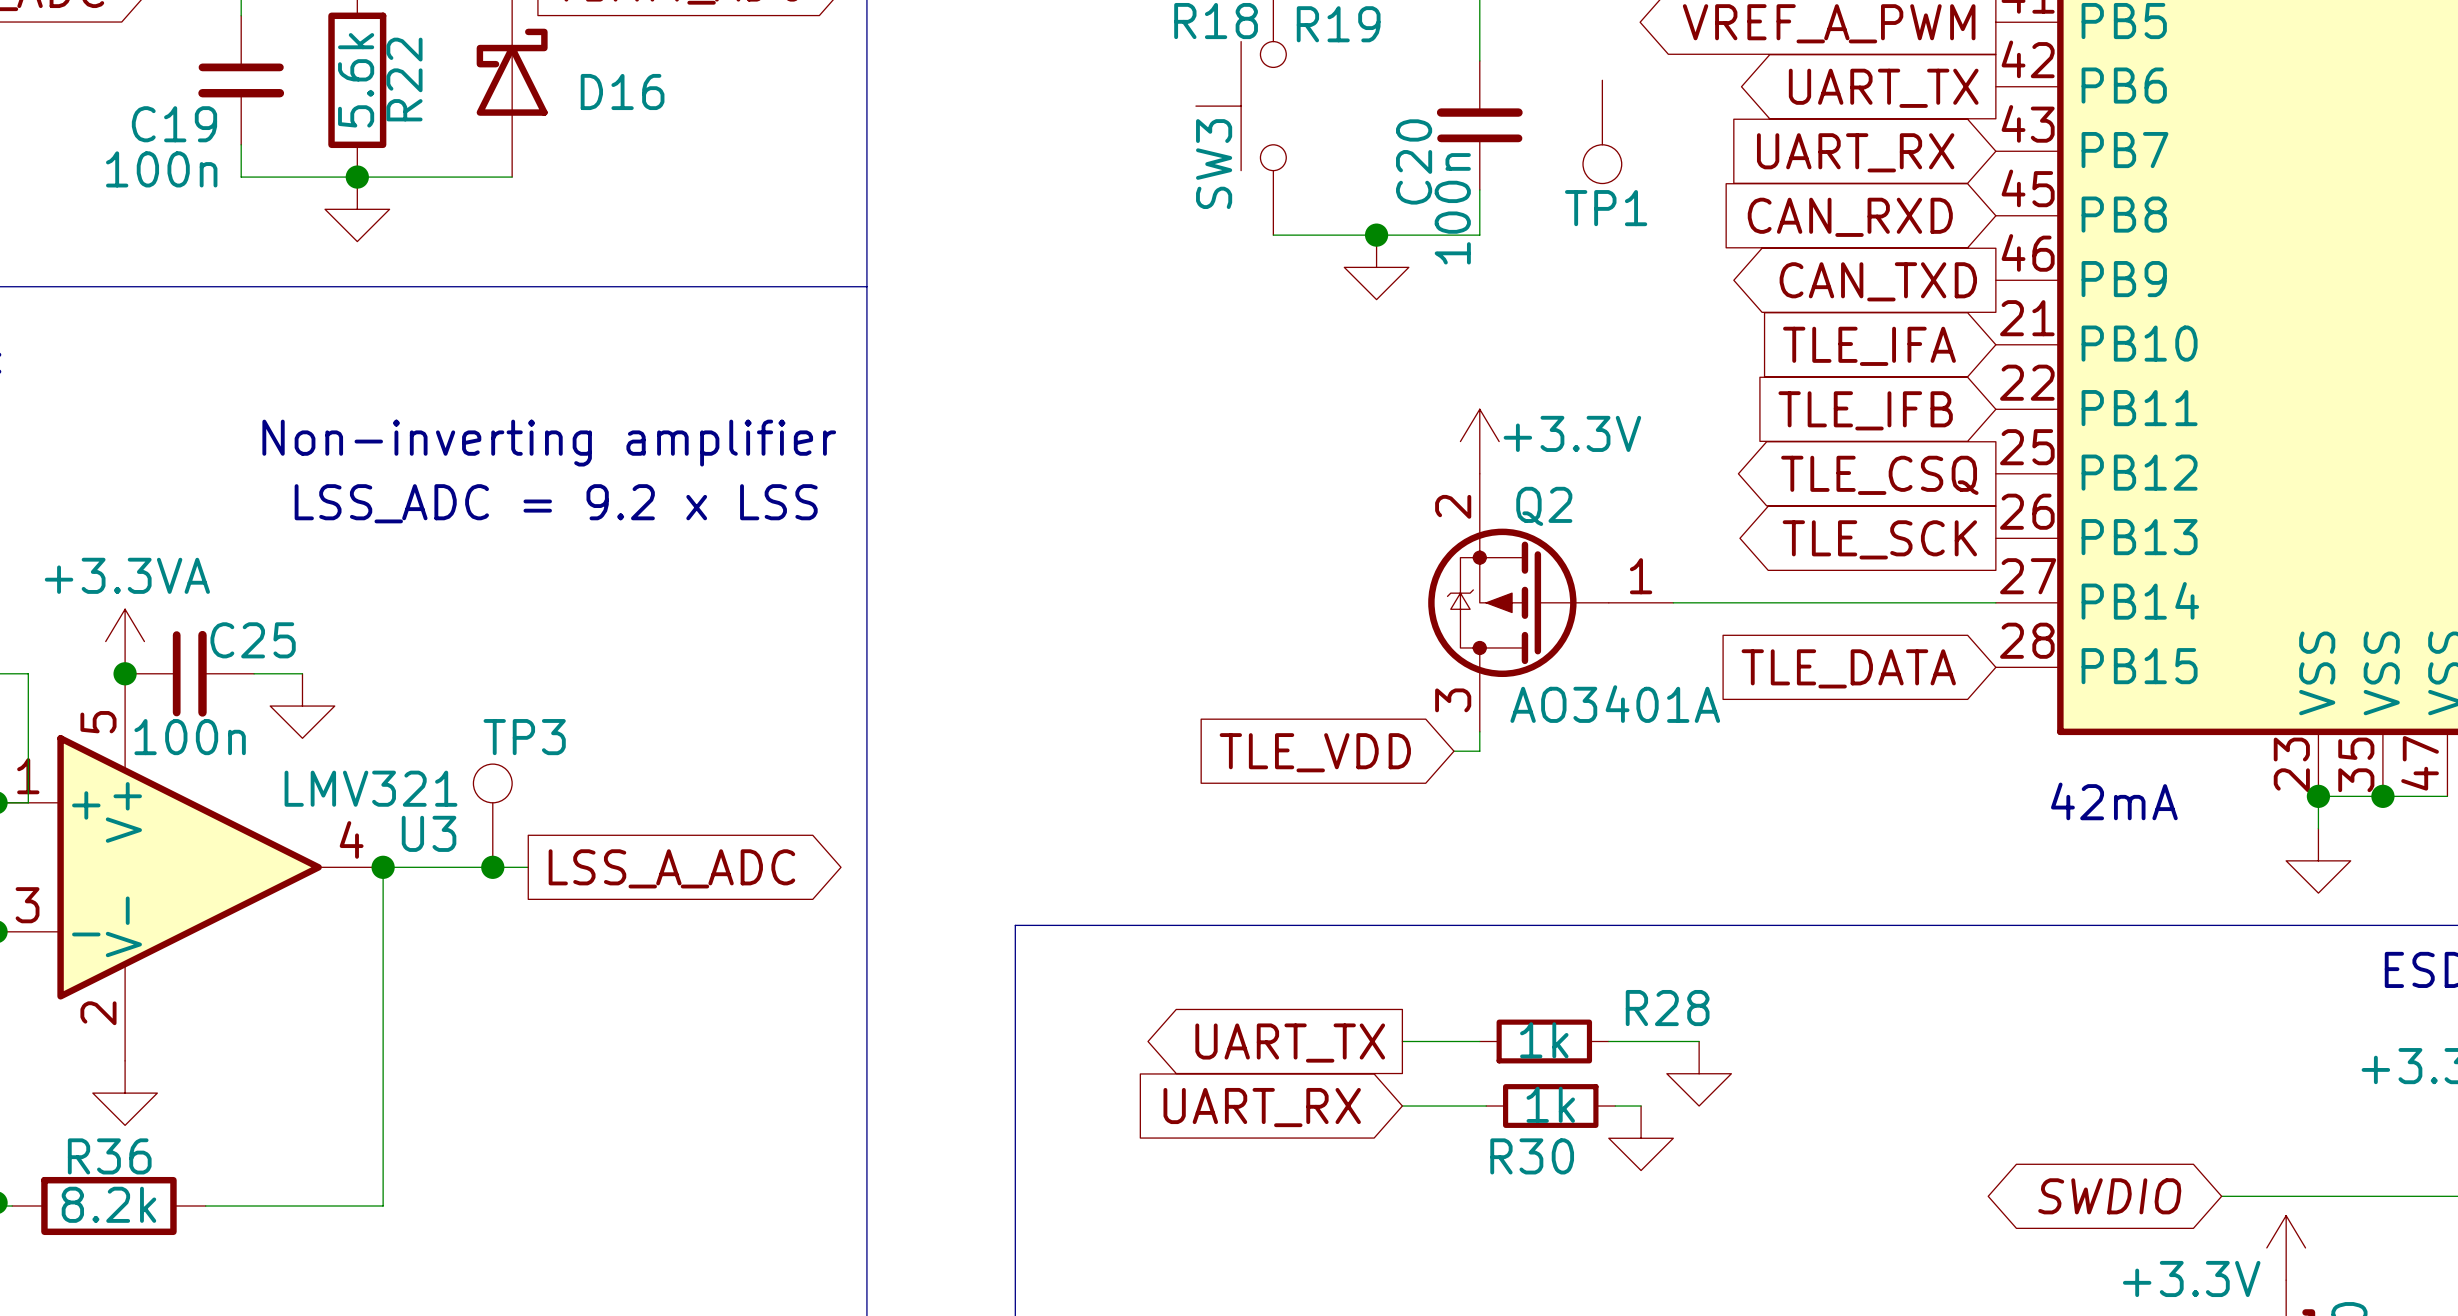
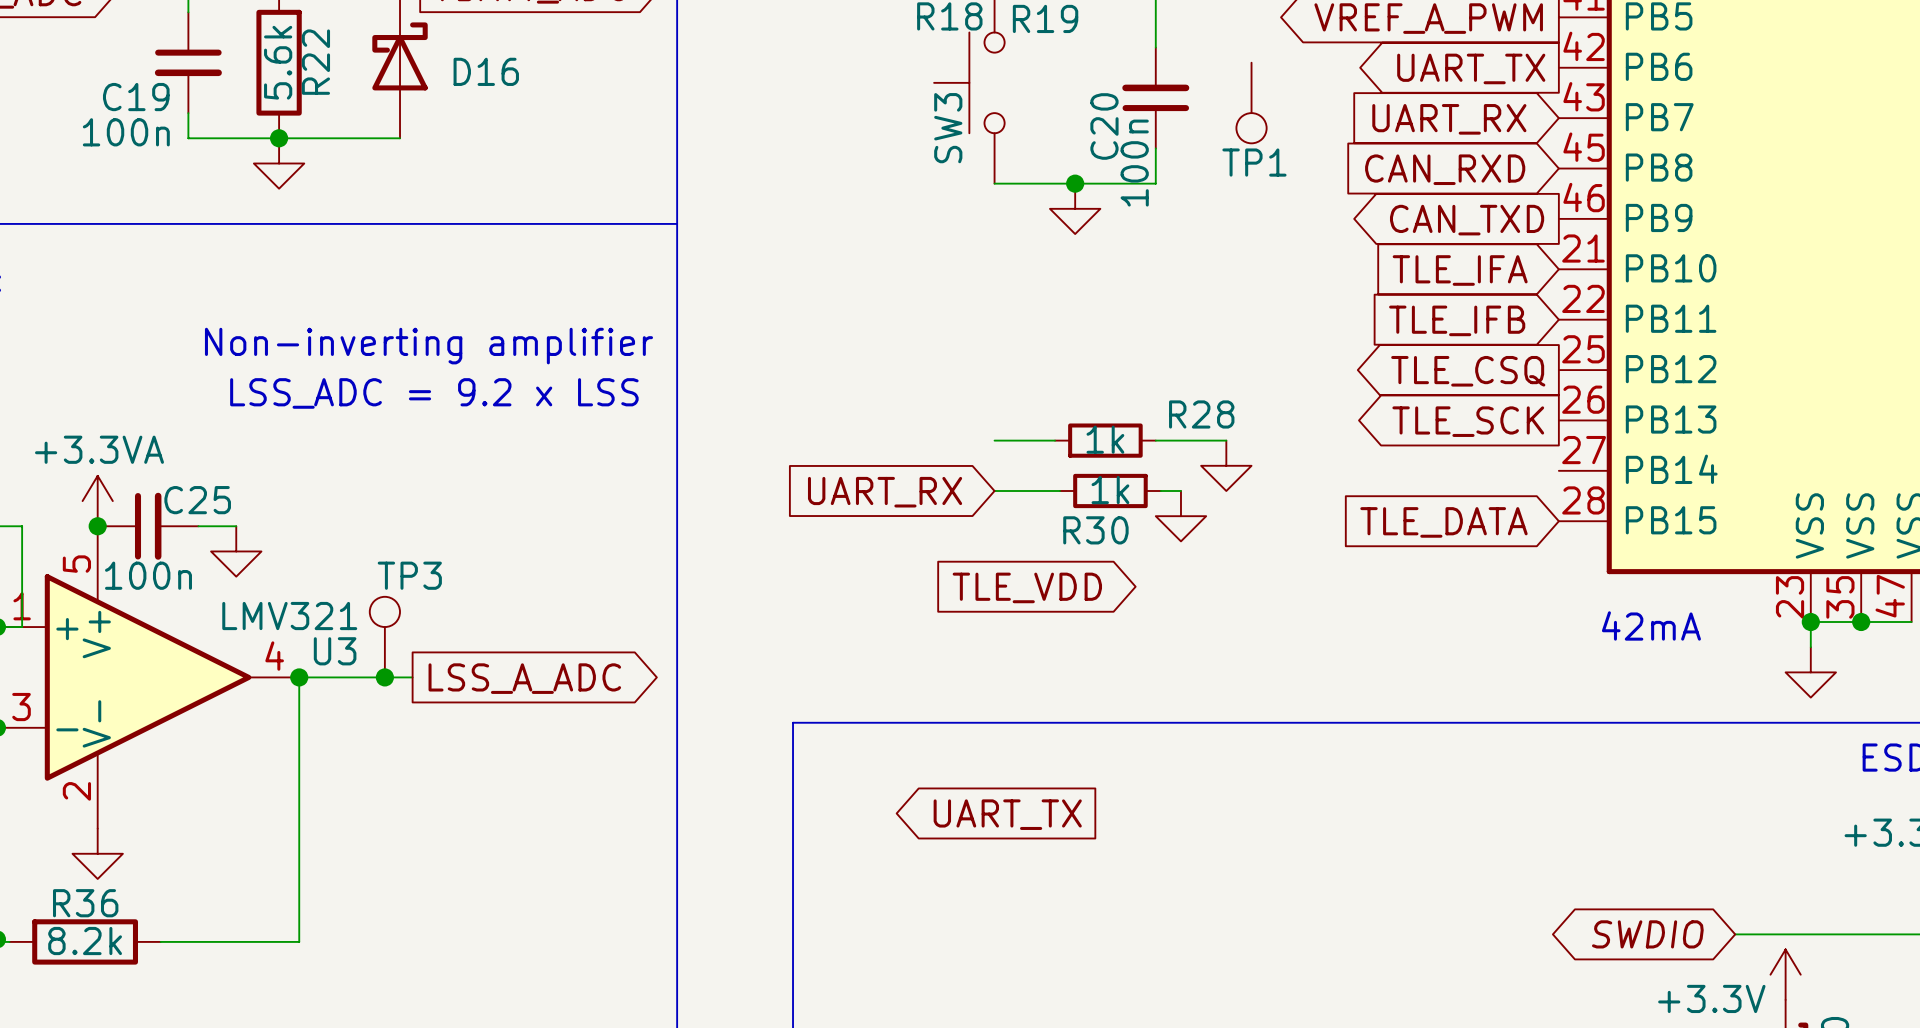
power symbol: +3.3V (1479, 441) -> none
power symbol: none -> (1226, 465)
Q2: AO3401A (1550, 602) -> none
wire: (1673, 602) (1995, 602) -> none
power symbol: none -> (1180, 516)
wire: (1479, 731) (1479, 751) (1453, 751) -> none
wire: (1402, 1041) (1479, 1041) -> (994, 440) (1055, 440)
R28 position: (1544, 1041) -> (1105, 440)
wire: (1608, 1041) (1699, 1041) -> (1155, 440) (1226, 440)
power symbol: (1699, 1073) -> none
wire: (1402, 1106) (1486, 1106) -> (994, 490) (1060, 490)
R30 position: (1550, 1106) -> (1110, 490)
wire: (1615, 1106) (1641, 1106) -> (1160, 490) (1180, 490)
global label position: UART_RX (1262, 1107) -> UART_RX (885, 492)
power symbol: (1641, 1138) -> none

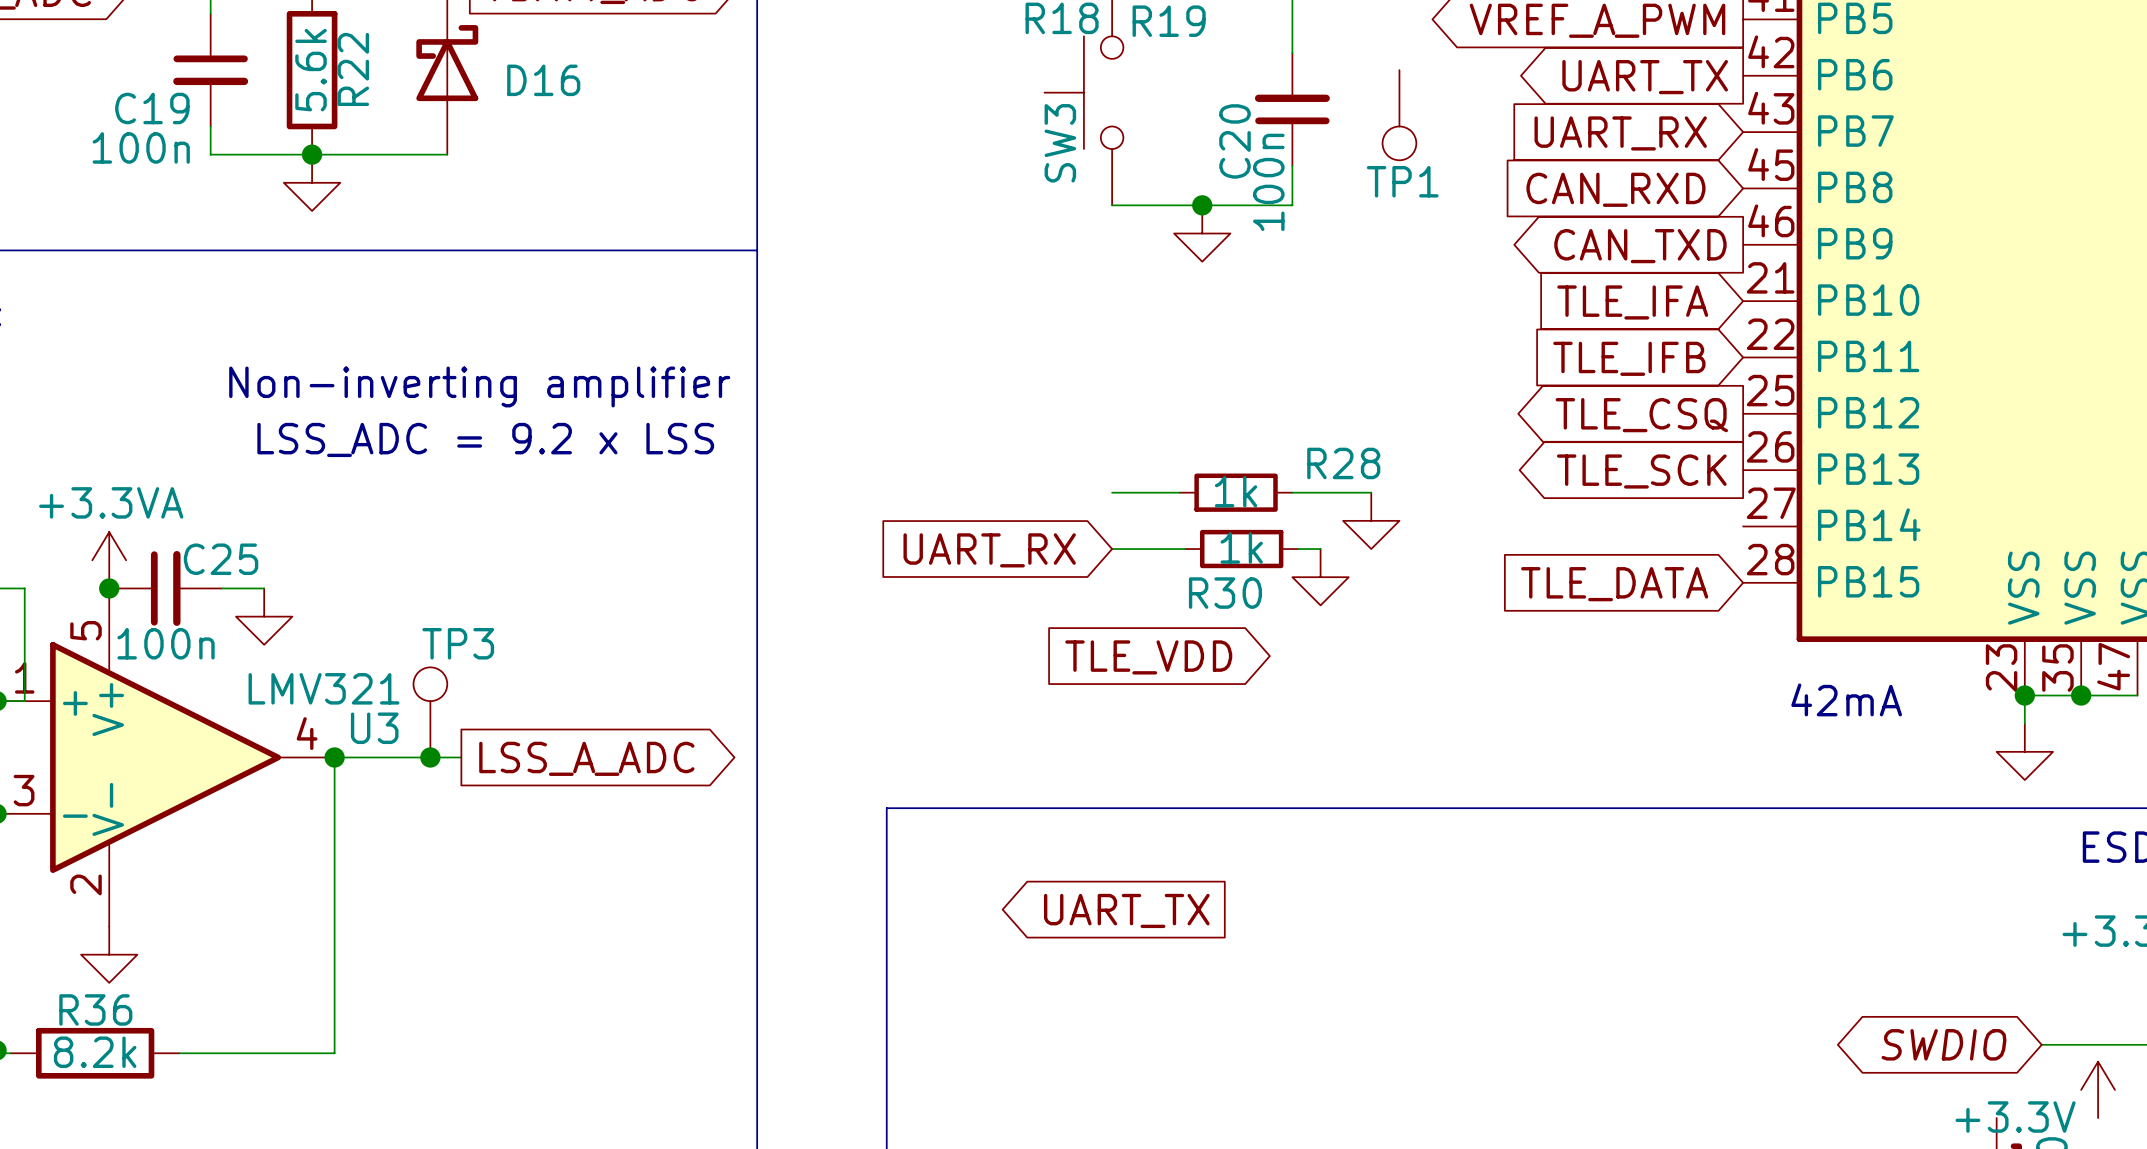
global label position: SWDIO (1647, 934) -> SWDIO (1944, 1044)
wire: (1735, 934) (1825, 934) -> none
power symbol position: +3.3V (1785, 974) -> +3.3V (2098, 1089)

